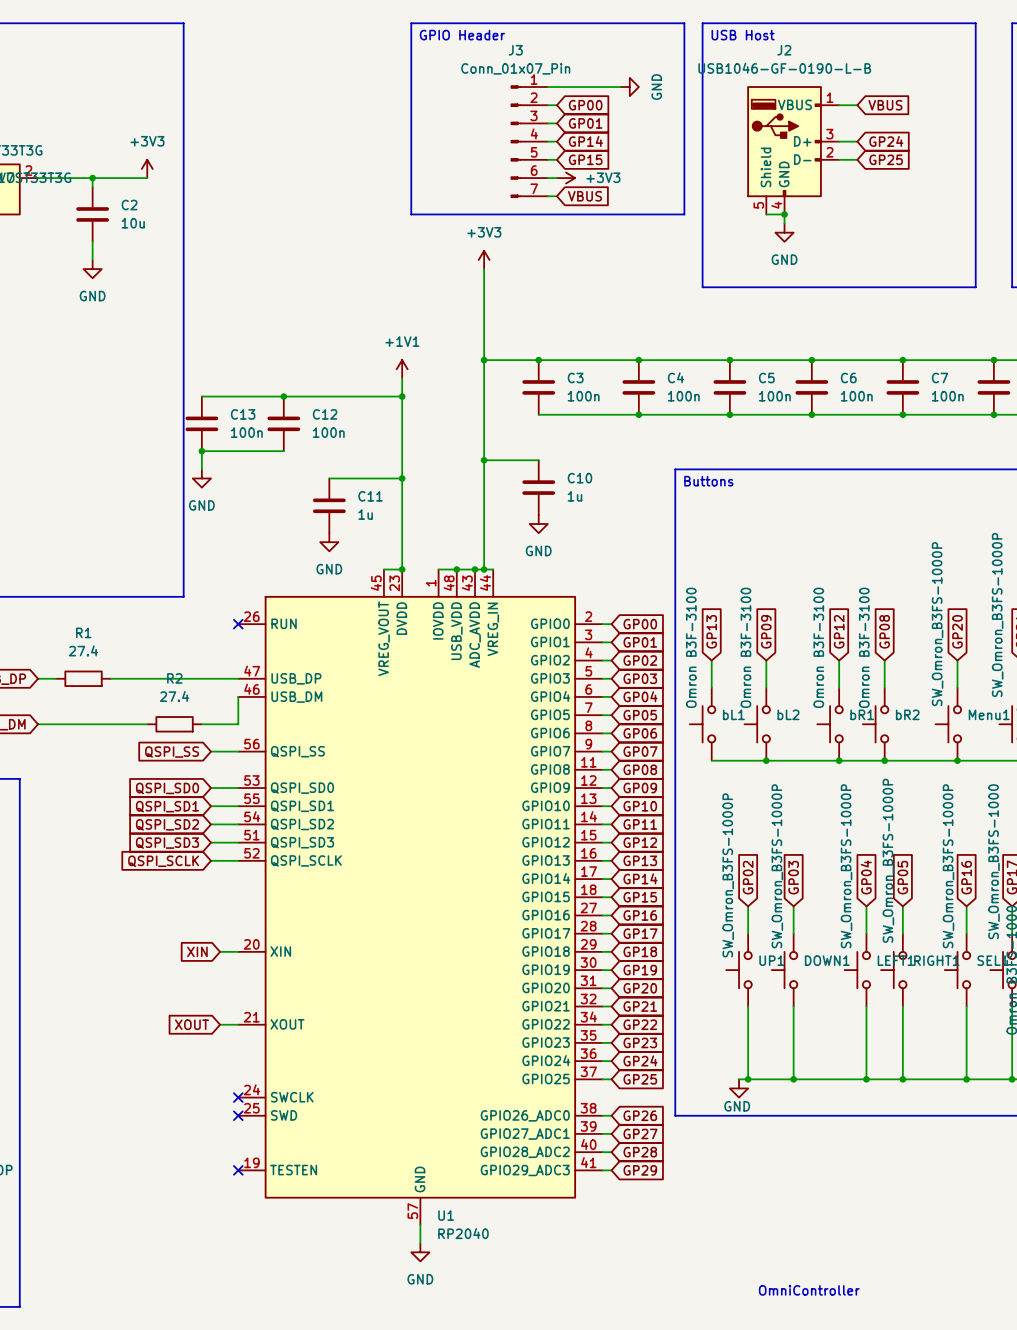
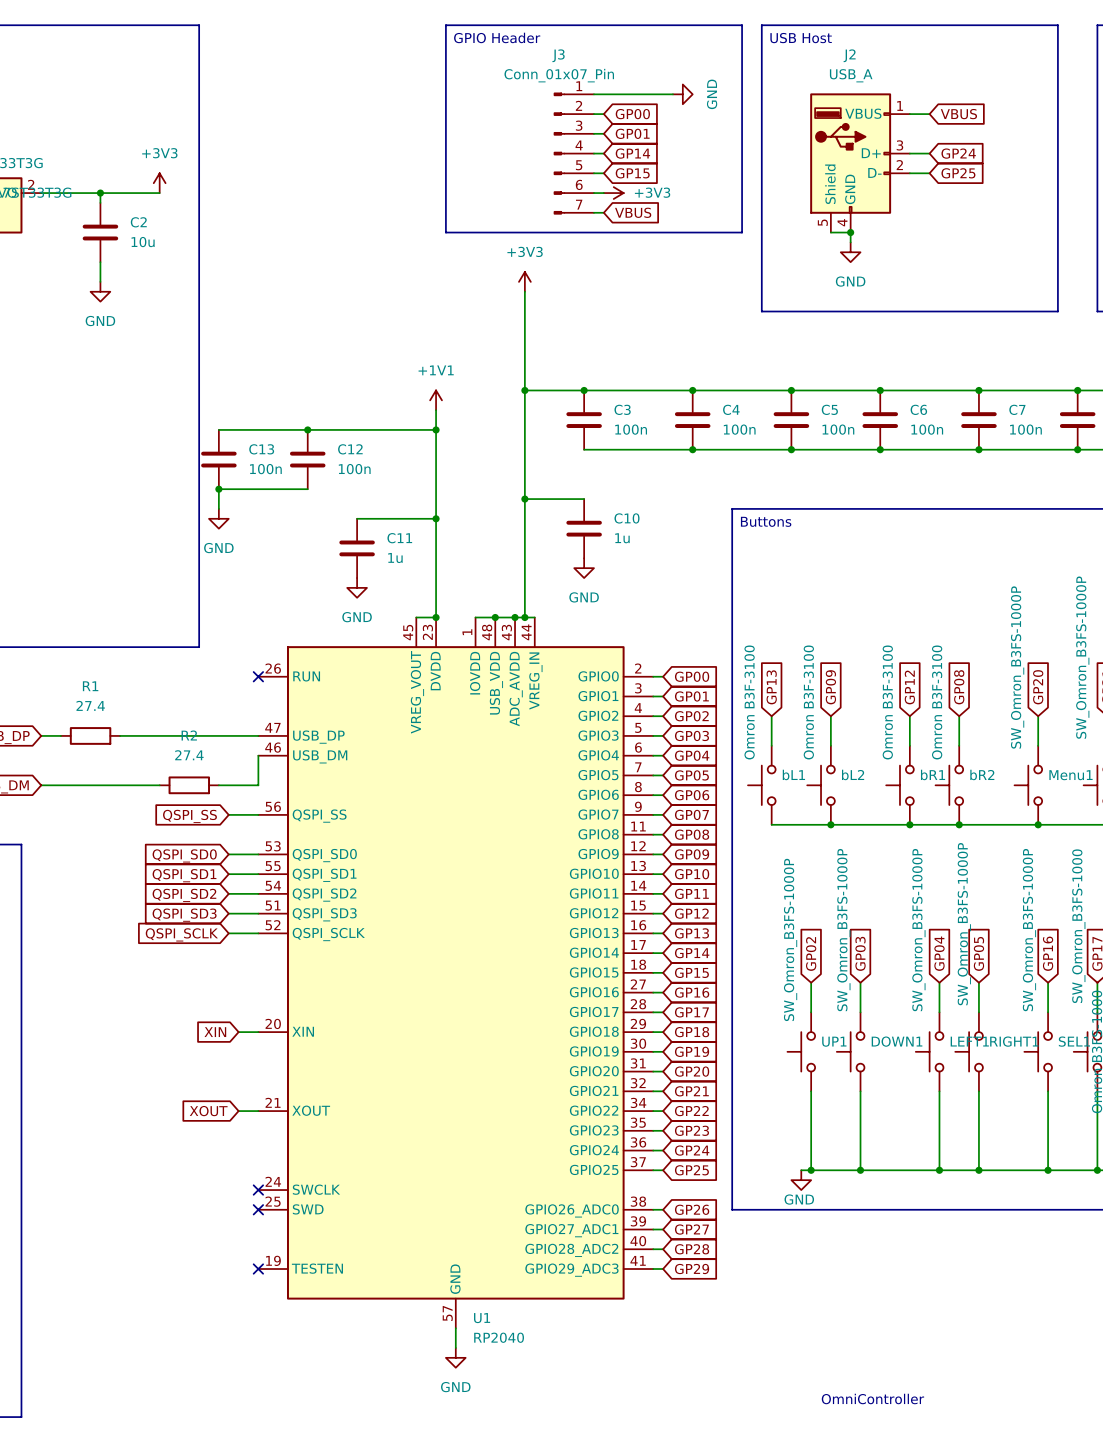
J2 value: USB1046-GF-0190-L-B (784, 68) -> USB_A (851, 75)

